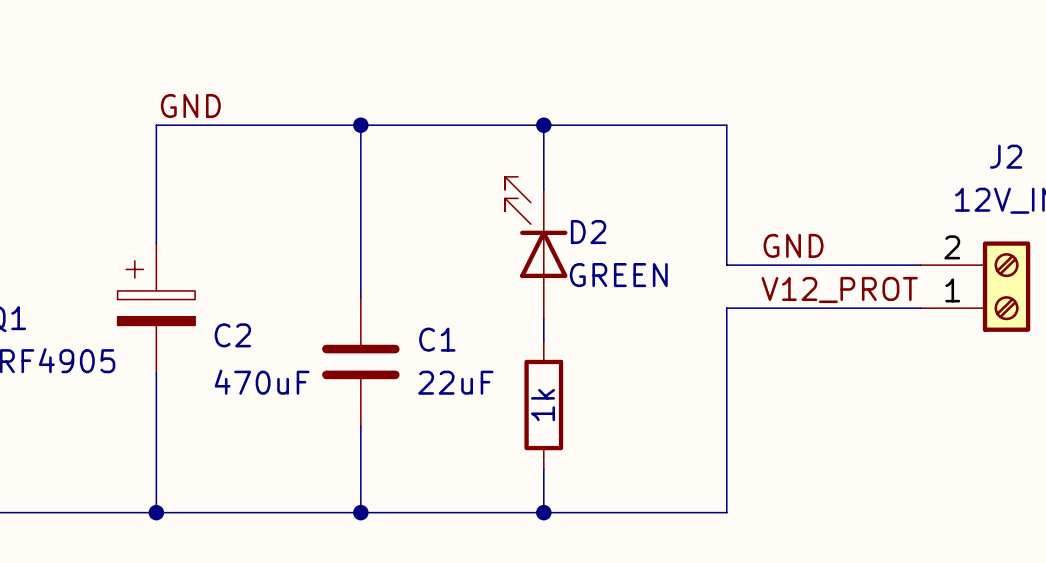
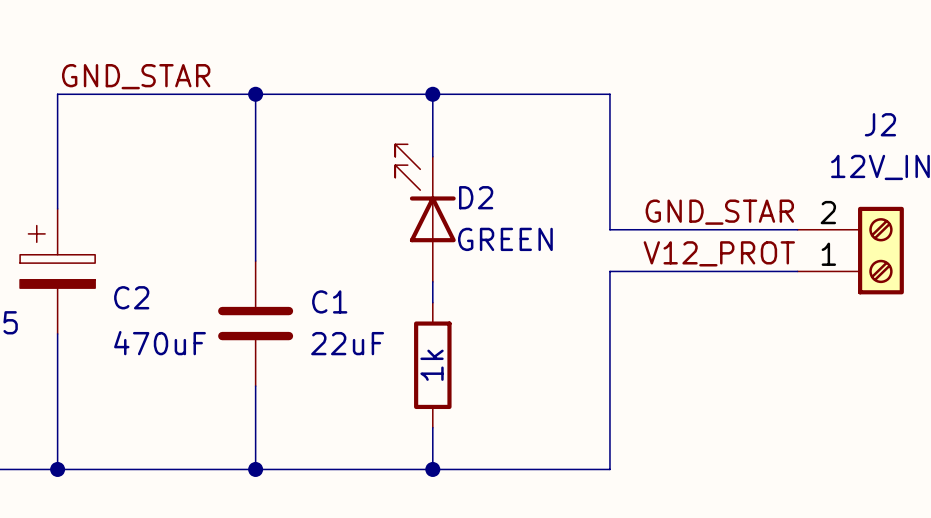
label: GND (190, 106) -> GND_STAR (136, 76)
label: GND (793, 245) -> GND_STAR (719, 212)

